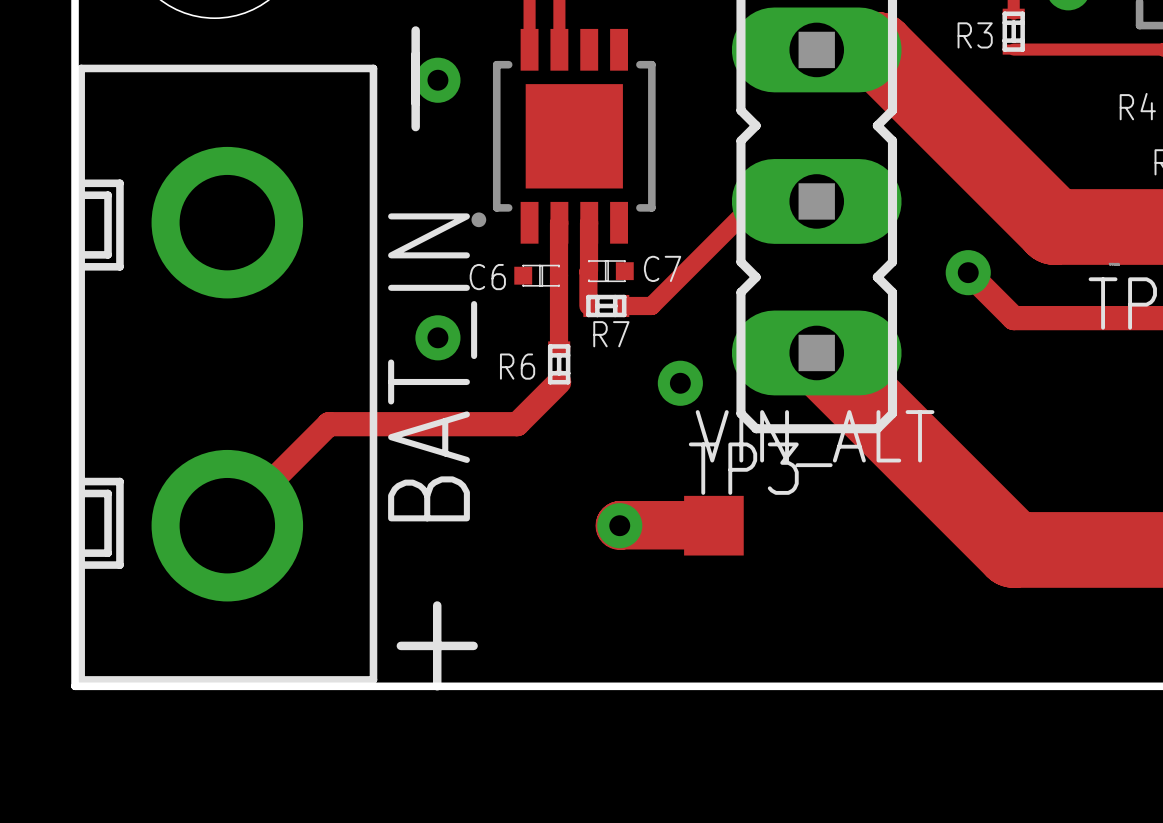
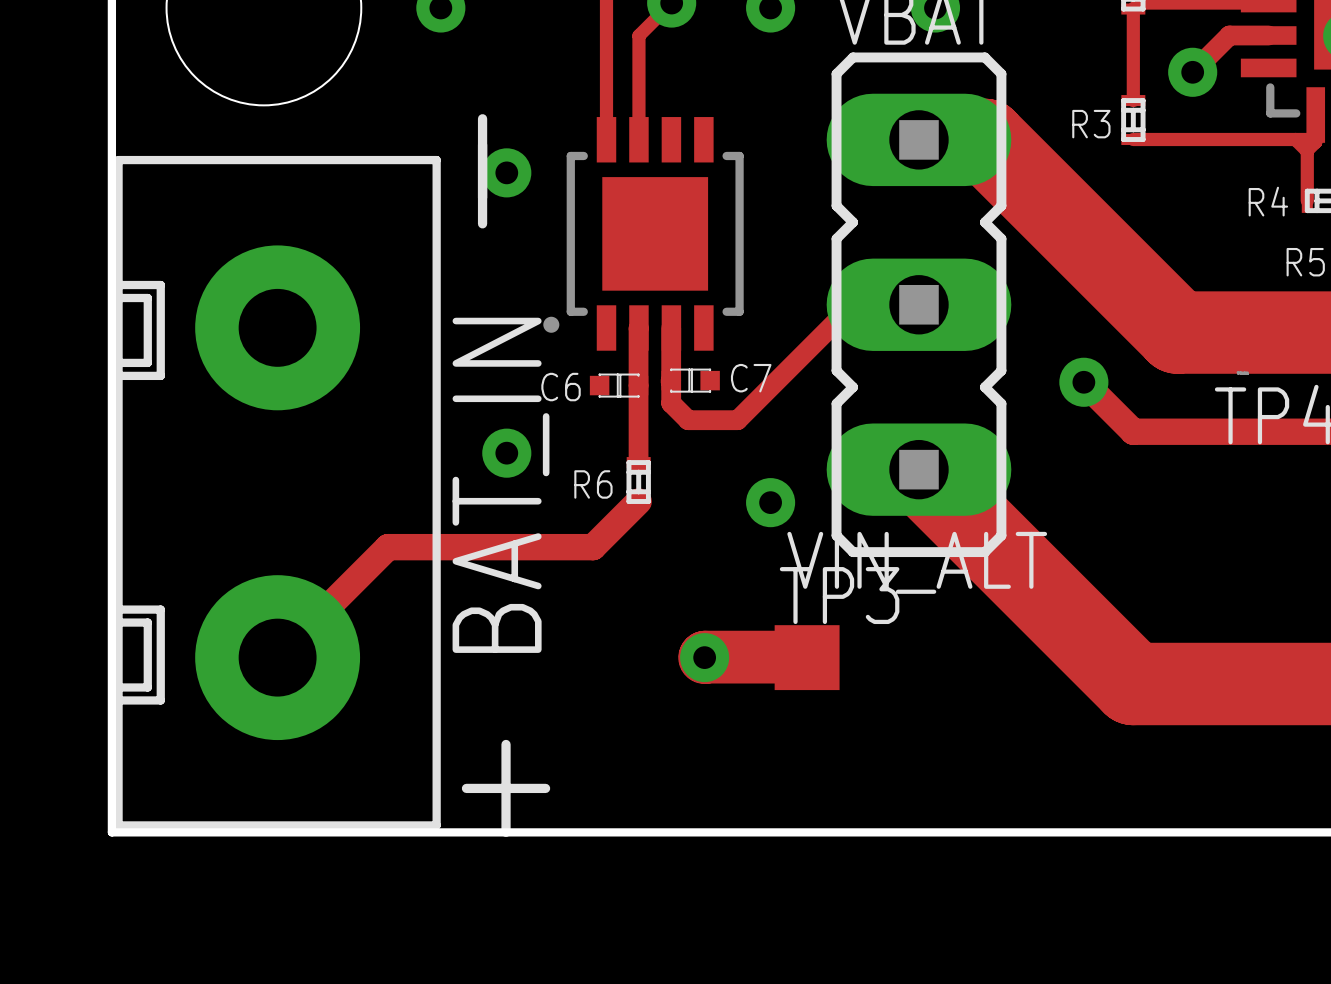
BAT_IN footprint: [77, 64, 378, 684] -> [114, 155, 441, 830]
track: (588, 271) (588, 306) -> none
R7: (606, 306) -> none
track: (624, 306) (651, 306) -> (671, 380) (671, 403) (688, 420) (737, 420) (739, 418)

